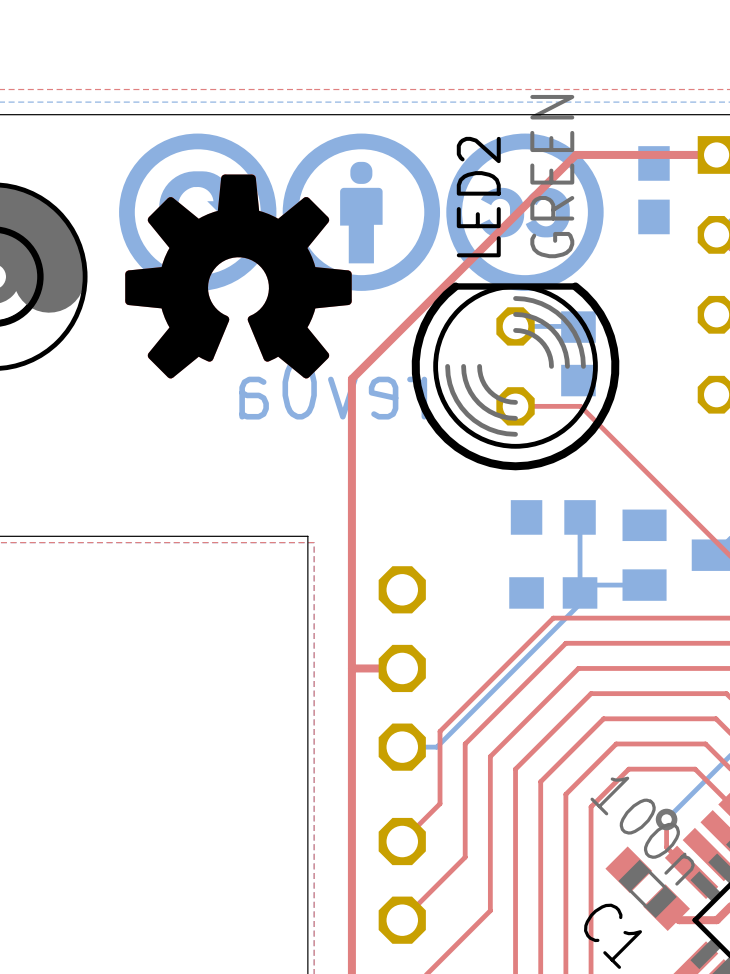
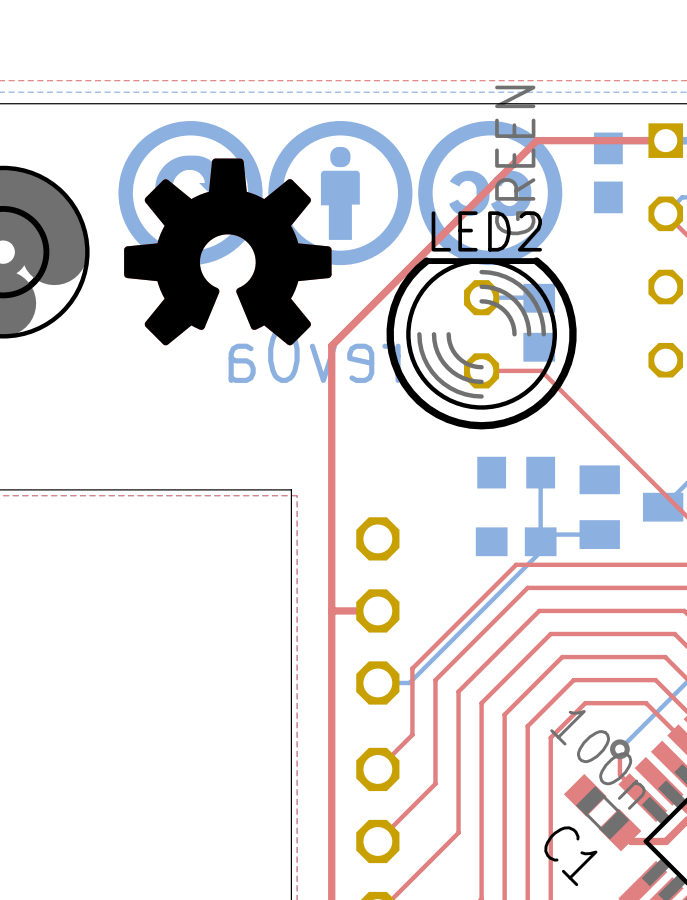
LED2 name rotation: 0° (478, 197) -> 90° clockwise (486, 231)

